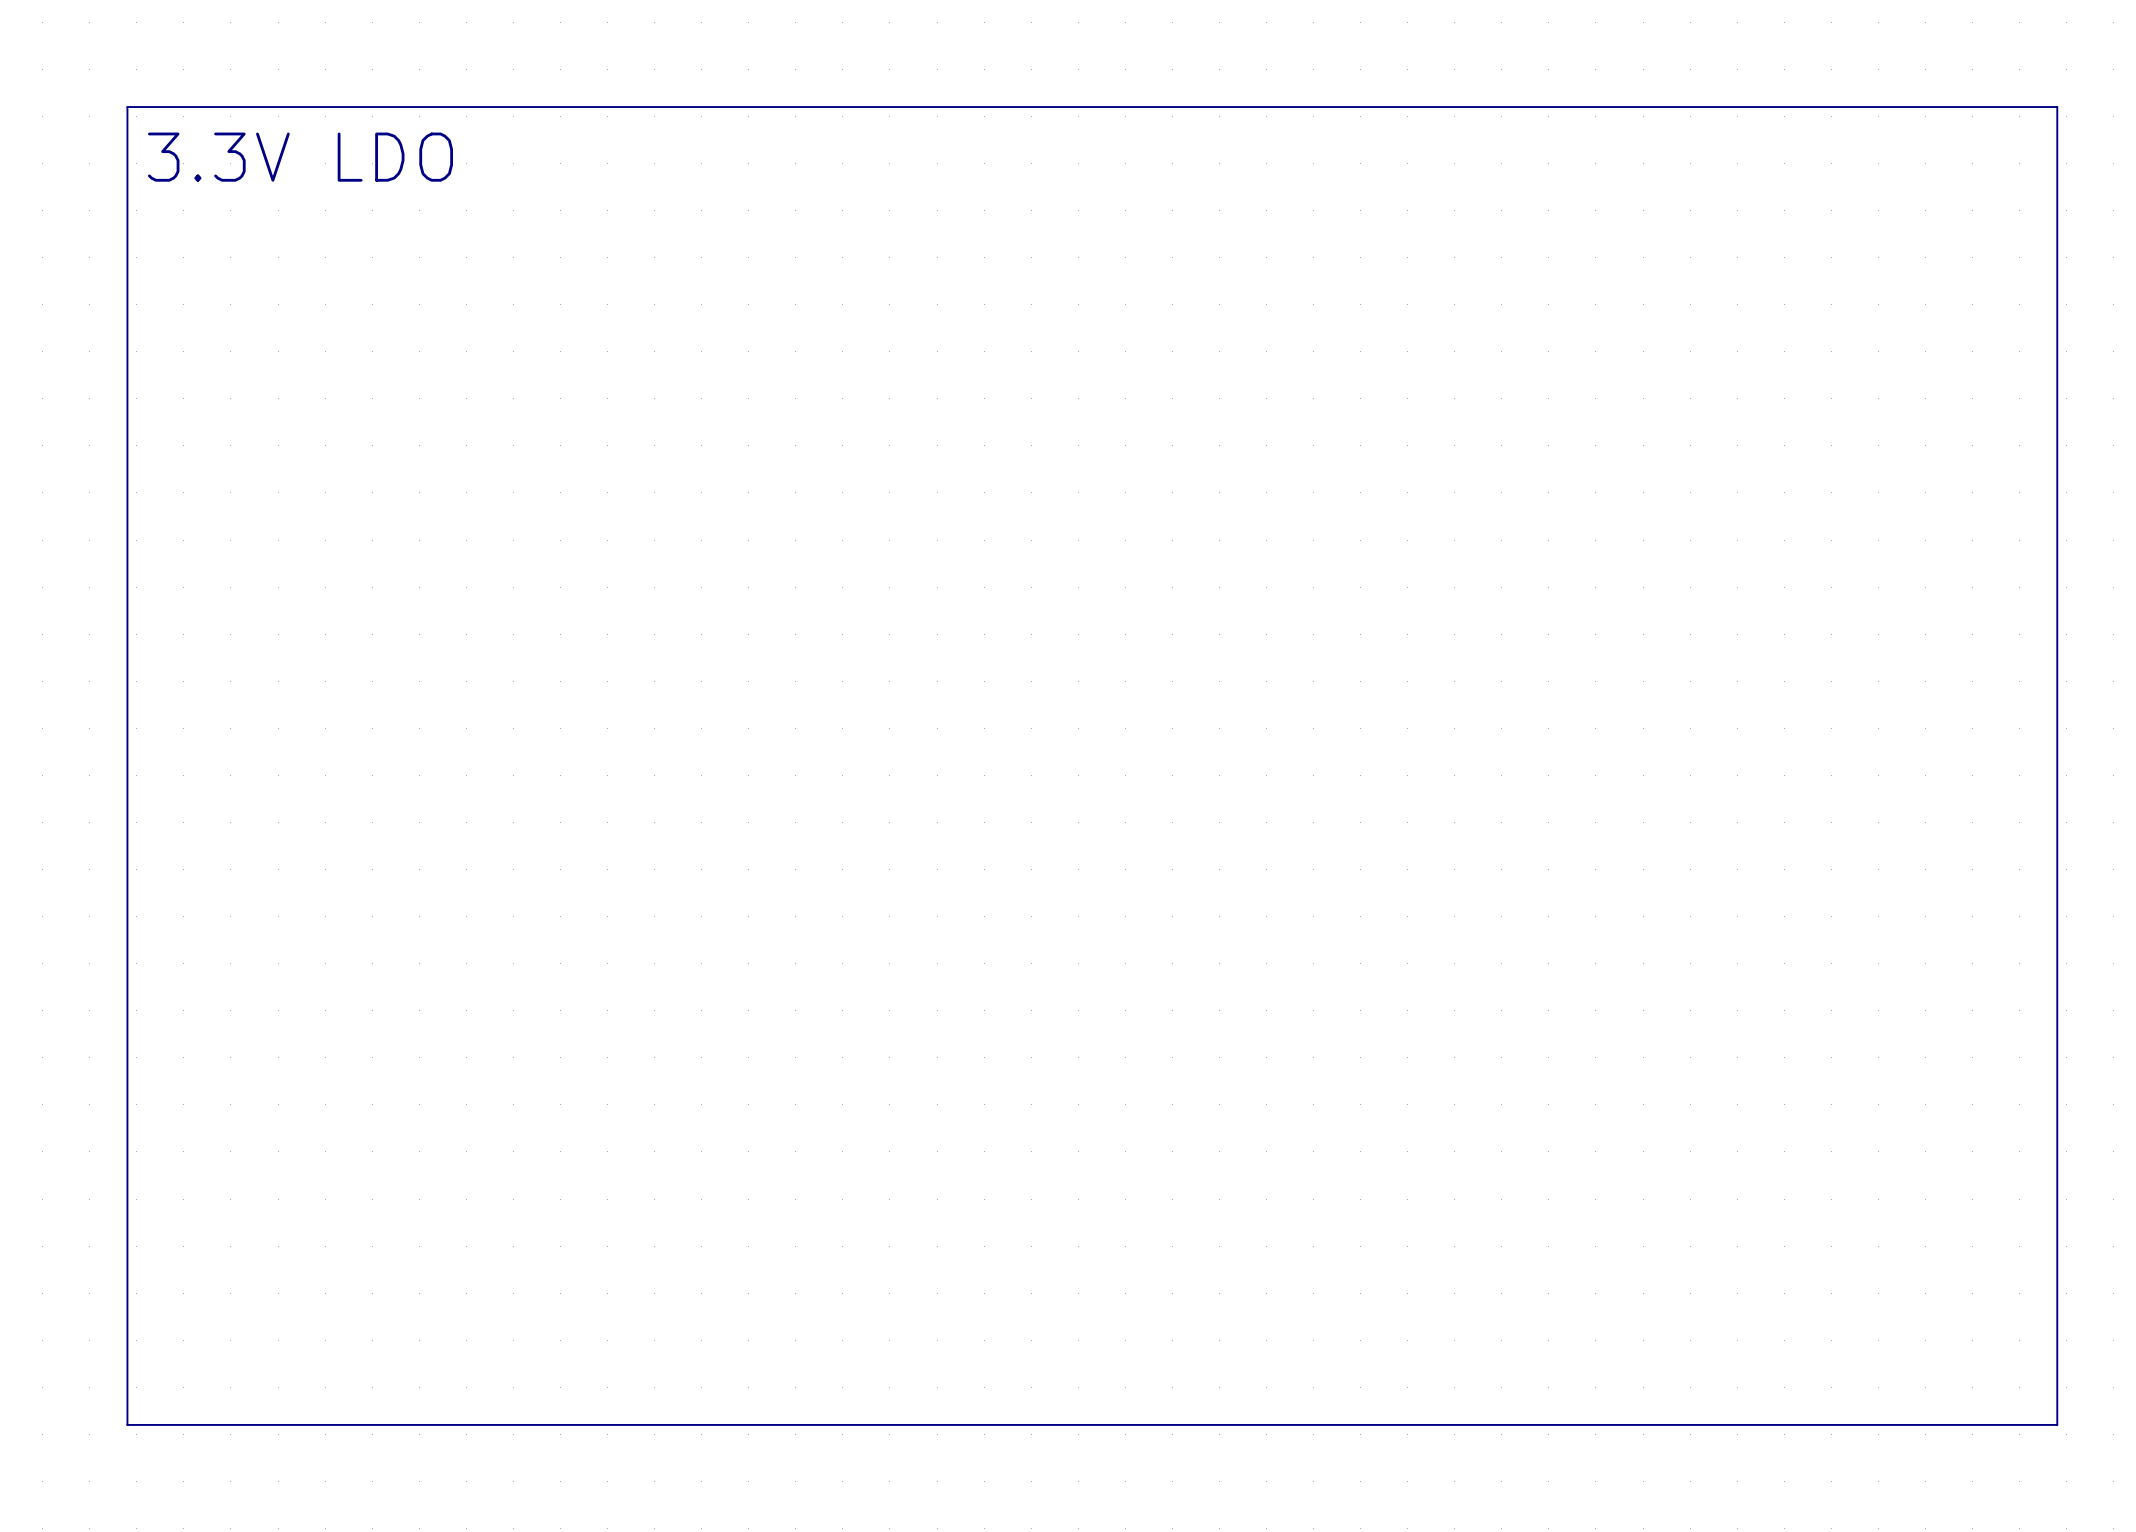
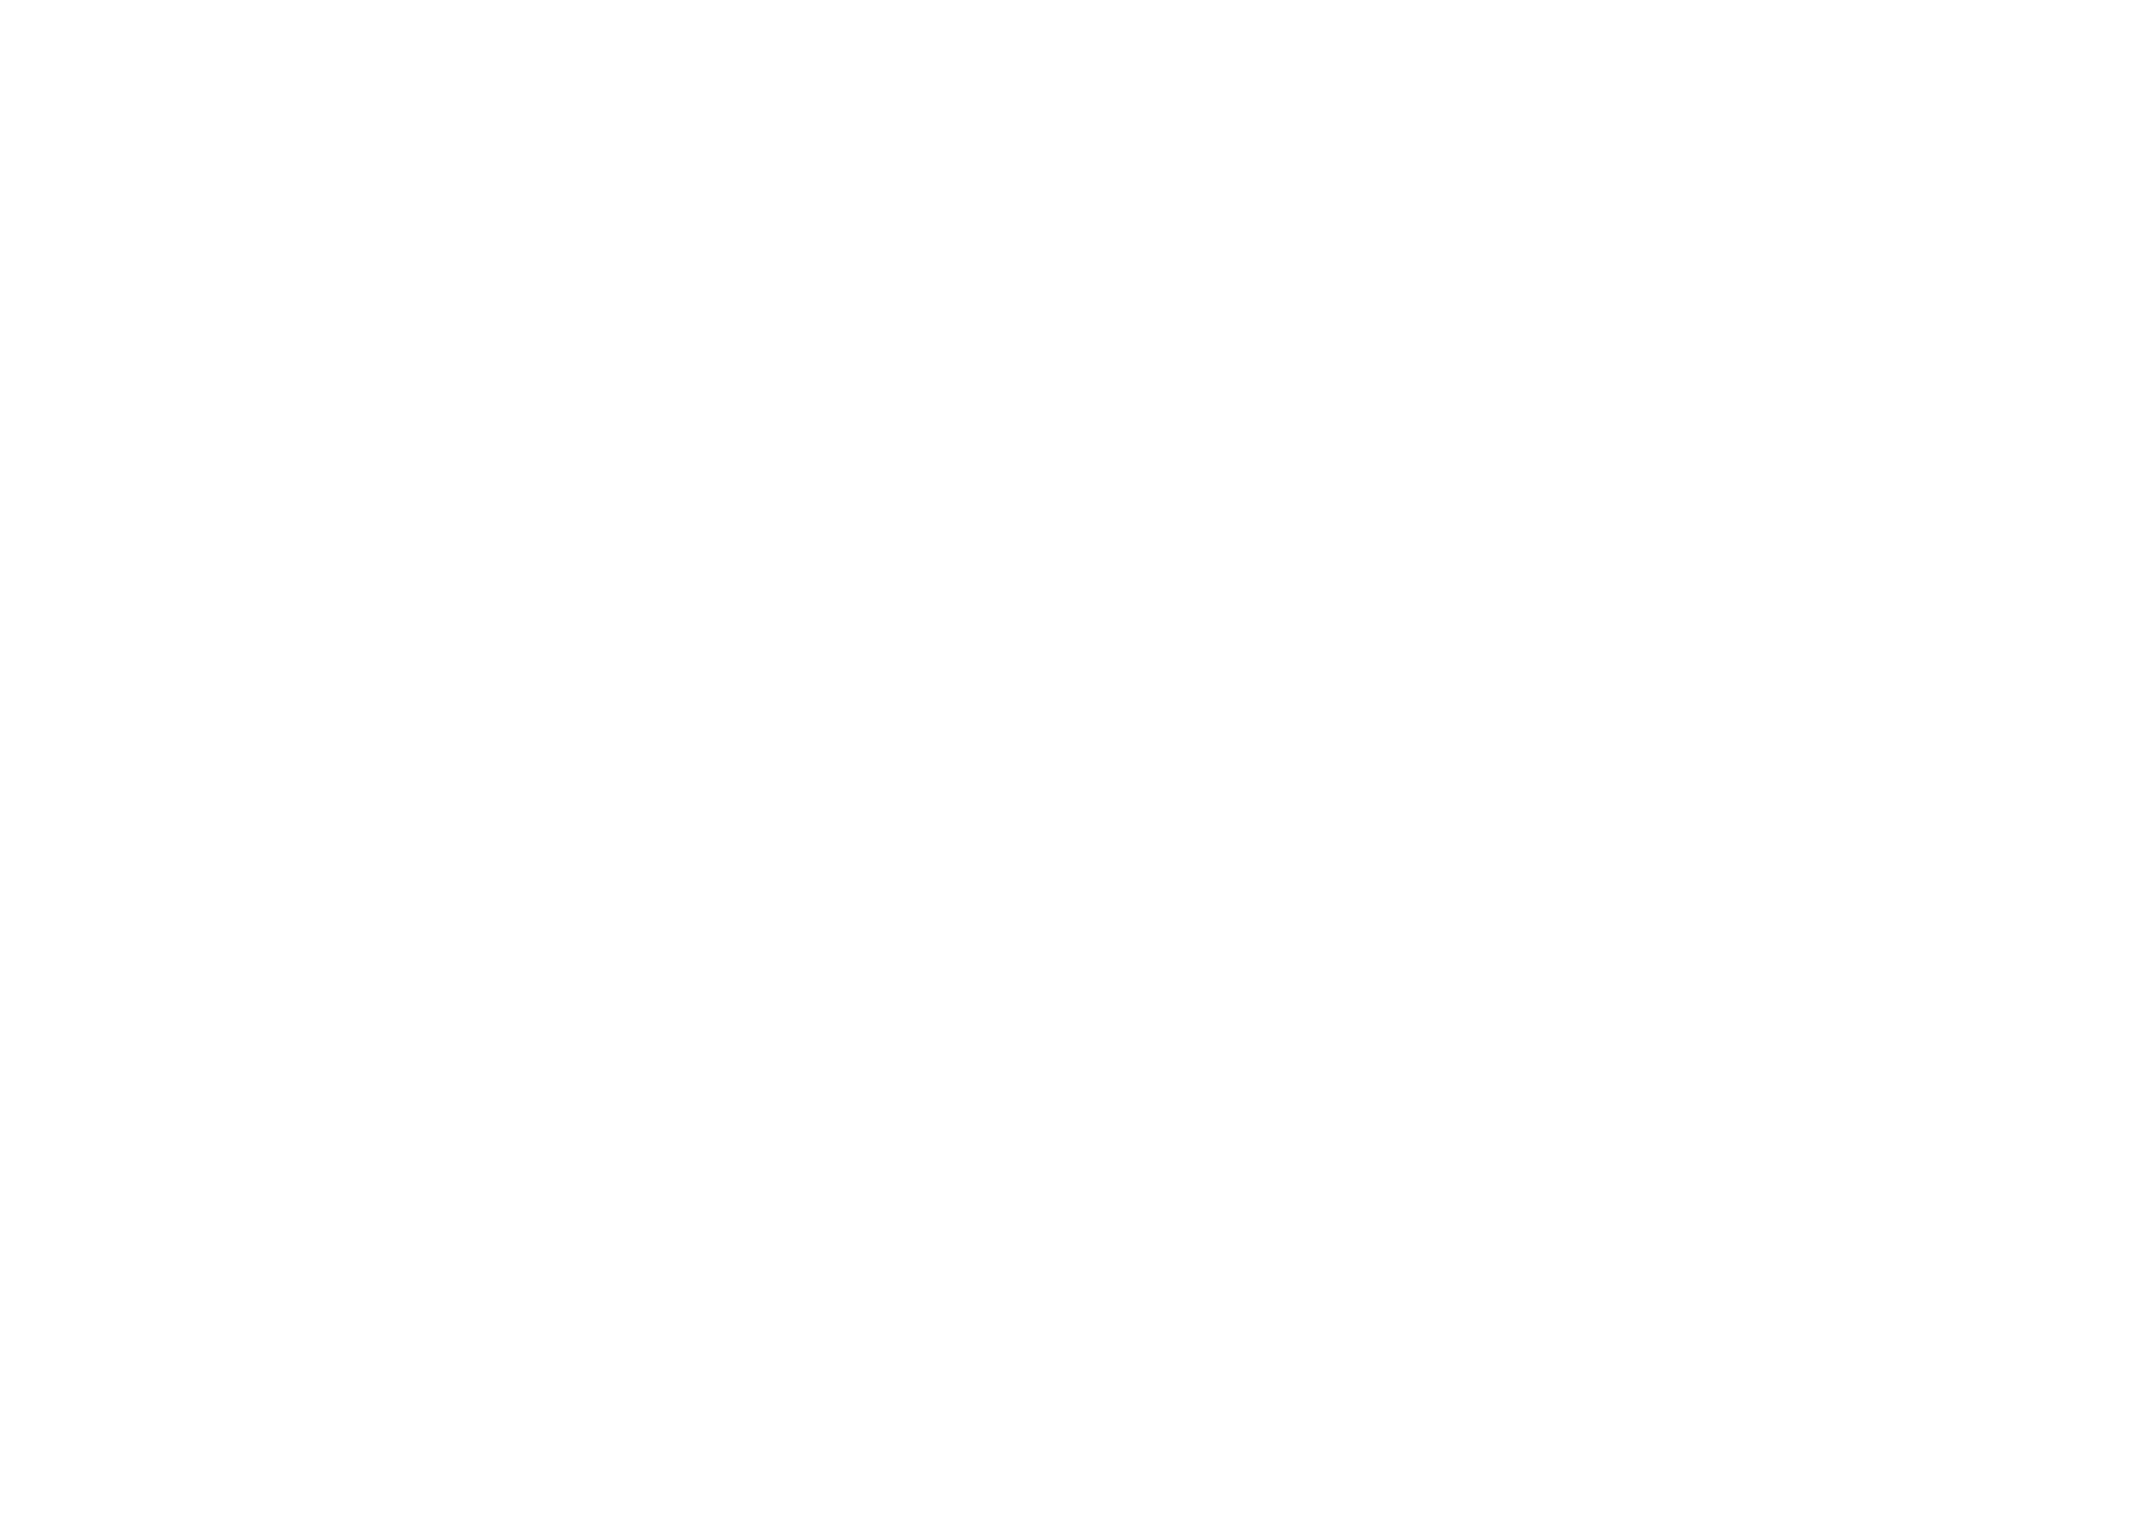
line: (127, 107) (2057, 107) (2057, 1424) (127, 1424) (127, 107) -> none
text: 3.3V LDO (300, 157) -> none

